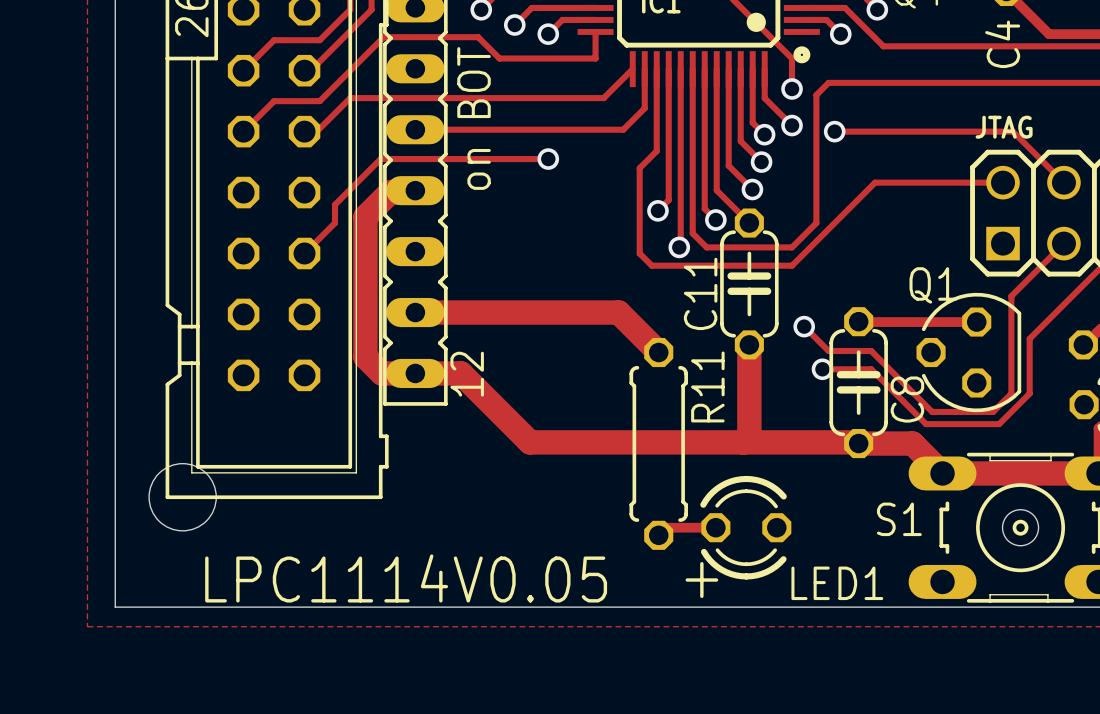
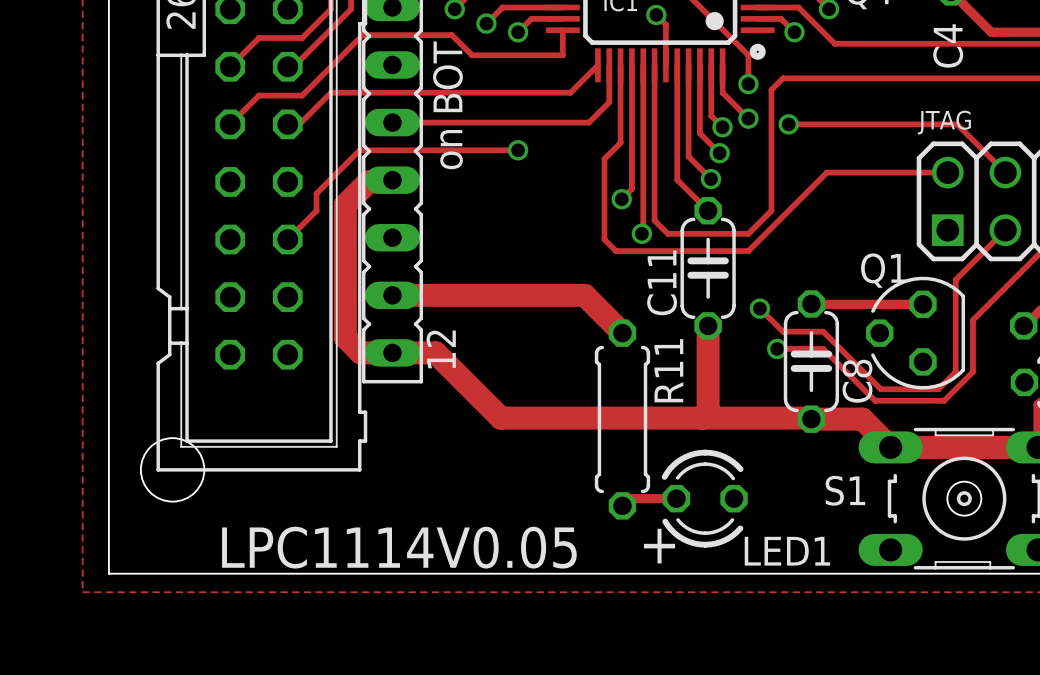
via: none -> (656, 14)
track: (704, 69) (704, 208) (715, 219) -> (665, 65) (665, 24) (656, 14)
via: (715, 219) -> none

